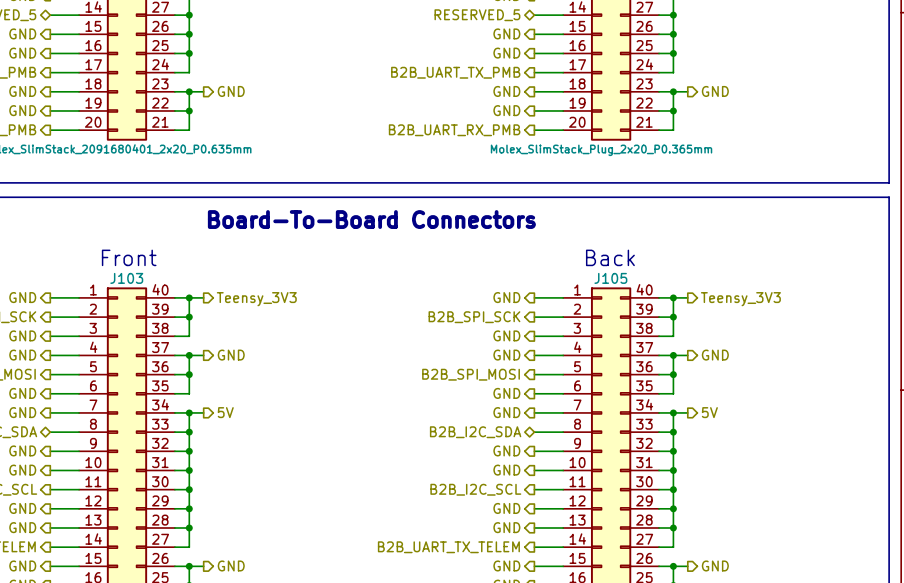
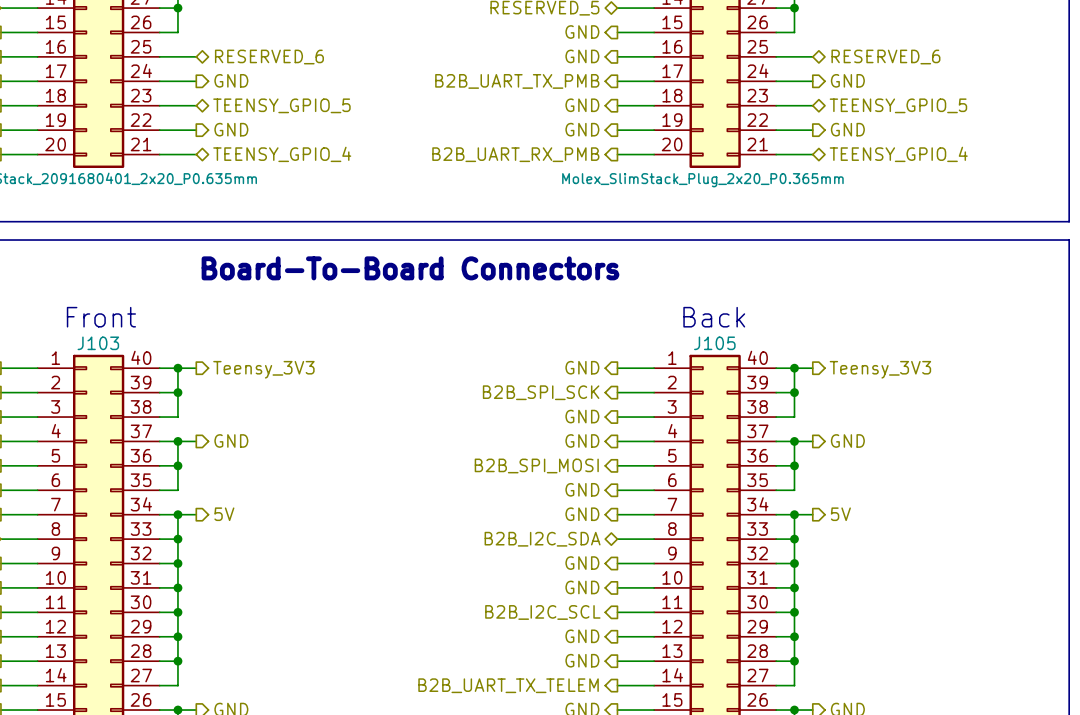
wire: (189, 34) (189, 72) -> (196, 81) (177, 81)
junction: (189, 34) -> none
wire: (673, 34) (673, 72) -> (812, 81) (794, 81)
junction: (673, 34) -> none
wire: none -> (177, 56) (196, 56)
junction: (189, 53) -> none
hierarchical label: none -> RESERVED_6 (269, 57)
wire: none -> (794, 56) (812, 56)
junction: (673, 53) -> none
hierarchical label: none -> RESERVED_6 (885, 57)
hierarchical label: none -> GND (231, 80)
hierarchical label: none -> GND (847, 80)
wire: (189, 91) (189, 130) -> (196, 154) (177, 154)
junction: (189, 91) -> none
hierarchical label shape: output (231, 91) -> bidirectional (281, 105)
hierarchical label: GND (231, 91) -> TEENSY_GPIO_5 (281, 105)
wire: (673, 91) (673, 130) -> (812, 154) (794, 154)
junction: (673, 91) -> none
hierarchical label shape: output (715, 91) -> bidirectional (898, 105)
hierarchical label: GND (715, 91) -> TEENSY_GPIO_5 (898, 105)
wire: none -> (177, 130) (196, 130)
junction: (189, 110) -> none
hierarchical label: none -> GND (231, 129)
wire: none -> (794, 130) (812, 130)
junction: (673, 110) -> none
hierarchical label: none -> GND (847, 129)
hierarchical label: none -> TEENSY_GPIO_4 (282, 154)
hierarchical label: none -> TEENSY_GPIO_4 (898, 154)

